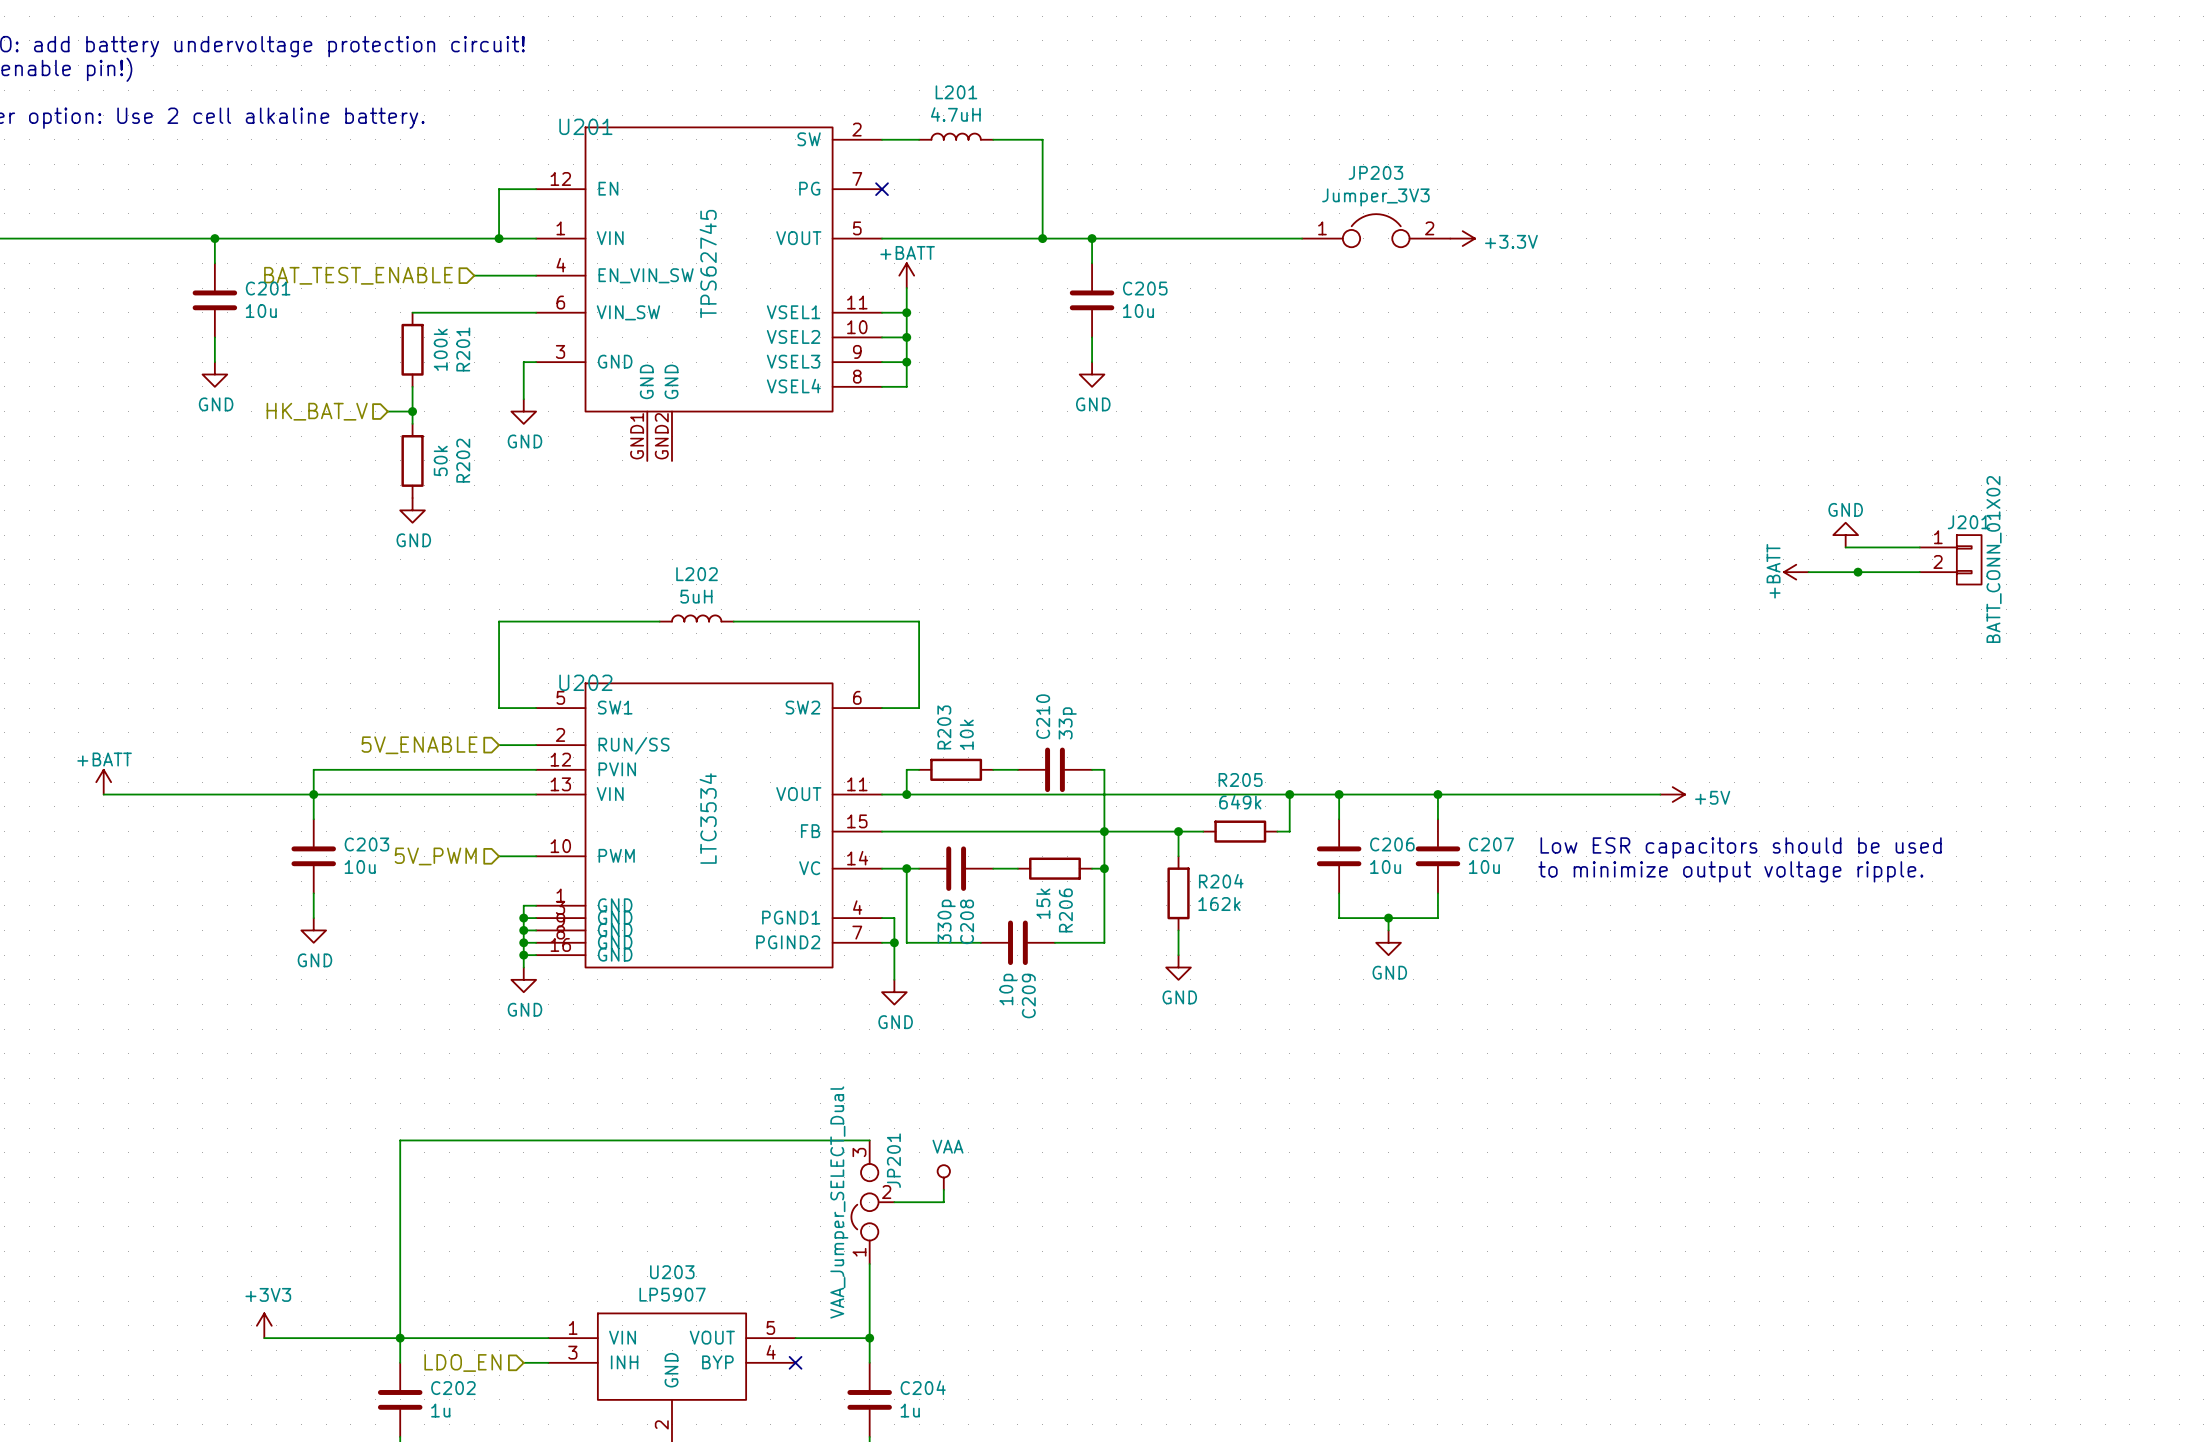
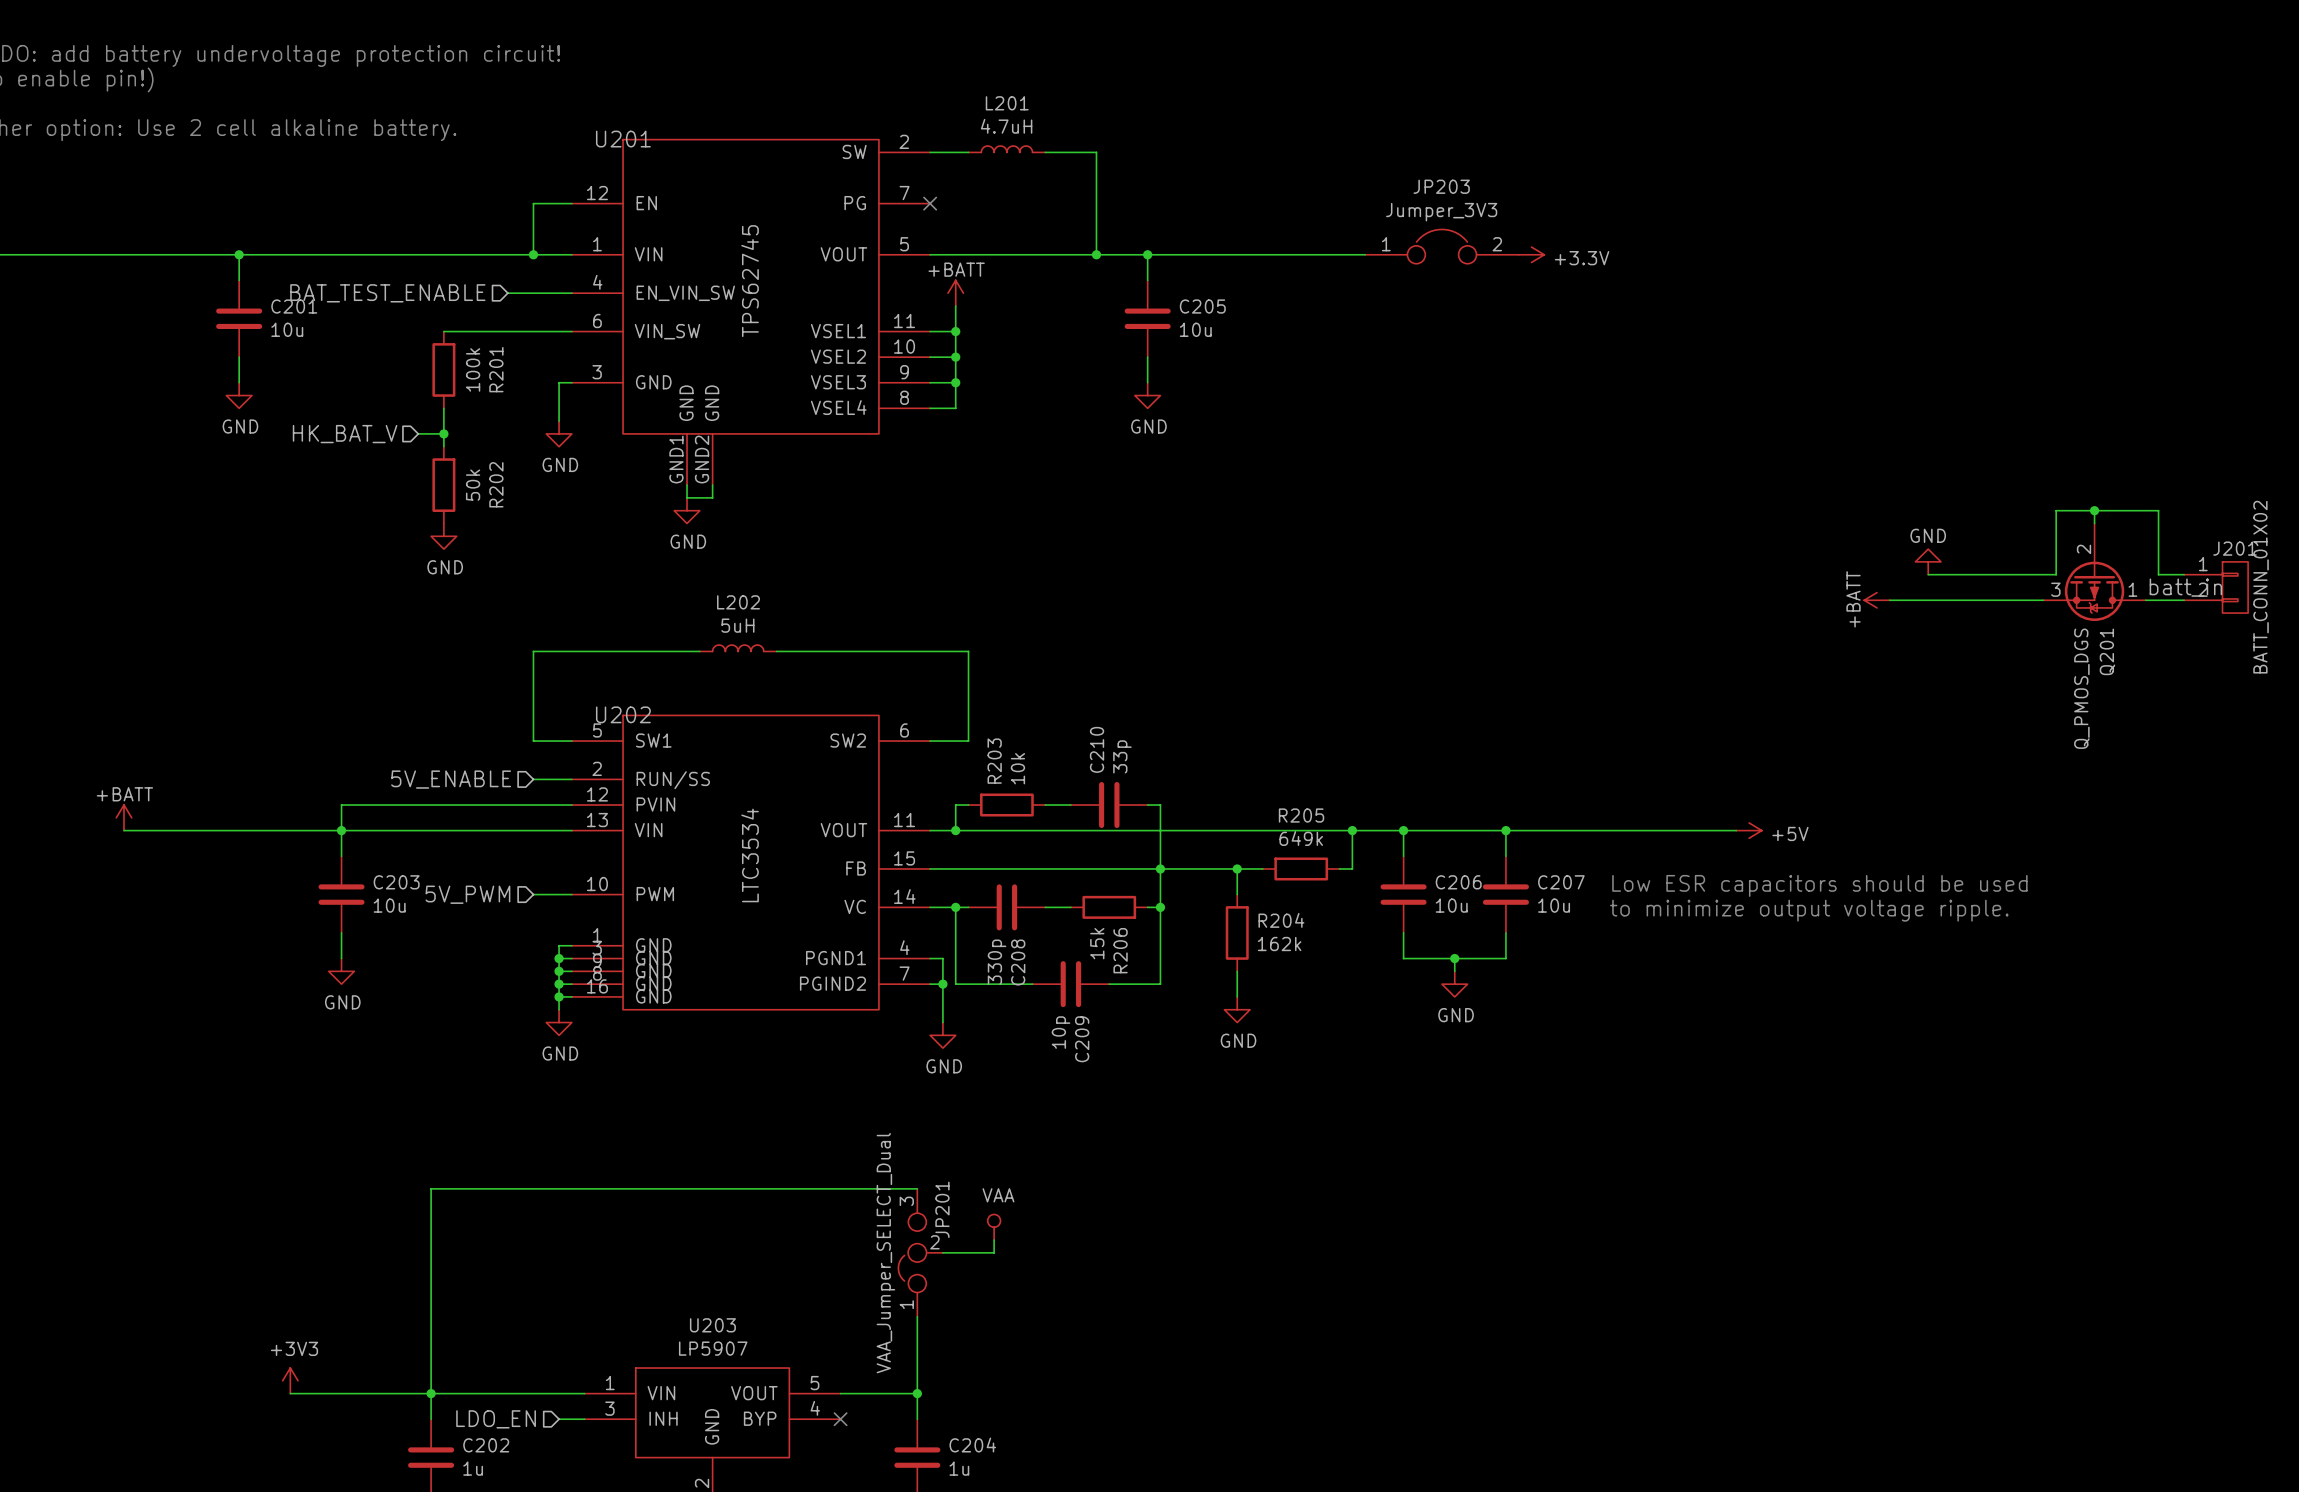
wire: none -> (687, 485) (687, 497) (712, 497) (712, 485)
power symbol: none -> GND (687, 510)
wire: none -> (2094, 510) (2094, 523)
junction: none -> (2094, 510)
Q201: none -> Q_PMOS_DGS (2094, 572)
wire: none -> (2004, 574) (2056, 574) (2056, 510) (2158, 510) (2158, 574) (2184, 574)
J201 position: (1950, 559) -> (2216, 587)
label: none -> batt_in (2185, 587)
junction: (1858, 572) -> none
wire: none -> (2145, 600) (2184, 600)

